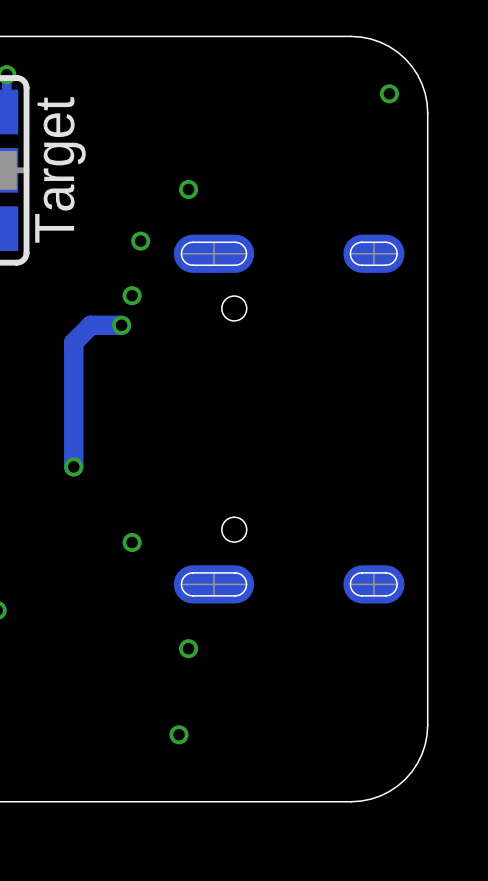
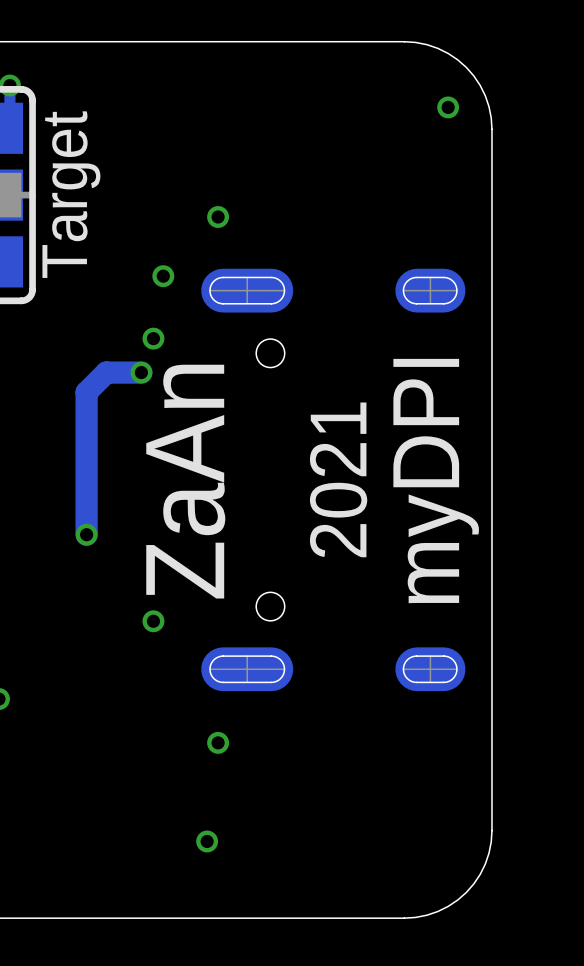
text: none -> 2021 (338, 479)
text: none -> ZaAn (185, 481)
text: none -> myDPI (436, 481)

